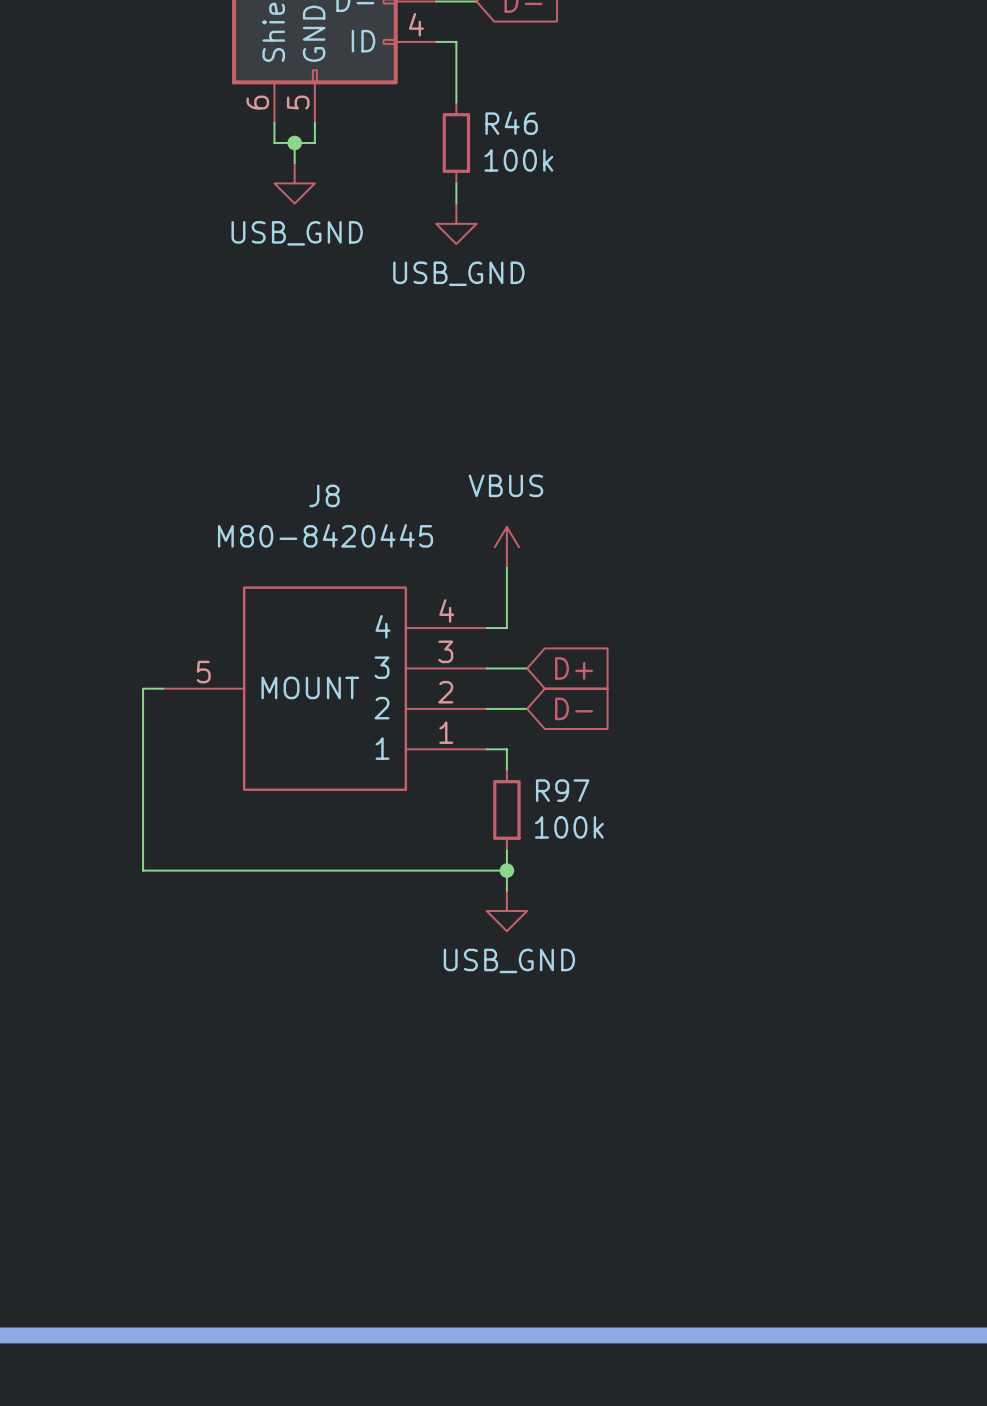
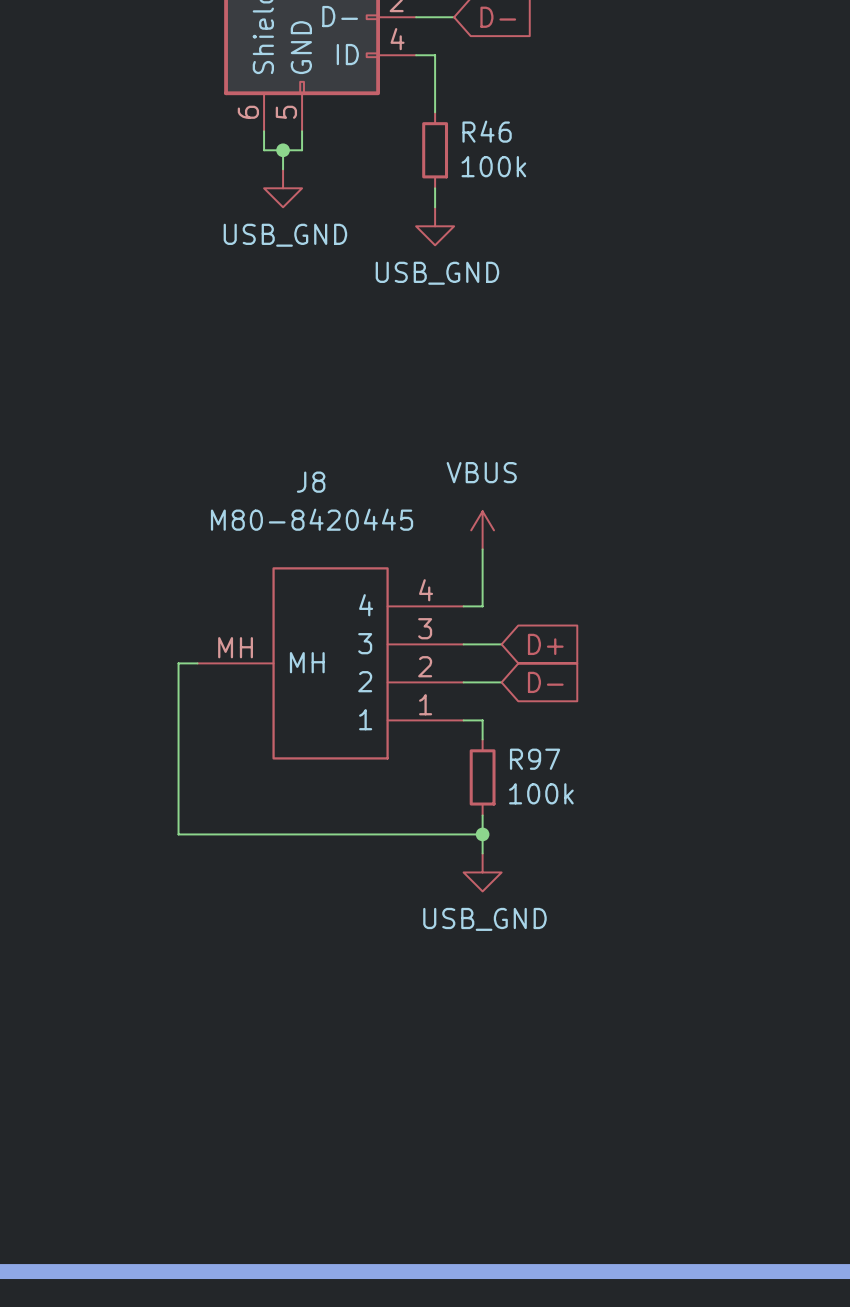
J8 symbol: [163, 586, 487, 791] -> [197, 567, 464, 760]
wire: (163, 688) (143, 688) (143, 870) (183, 870) -> (197, 663) (178, 663) (178, 834)

